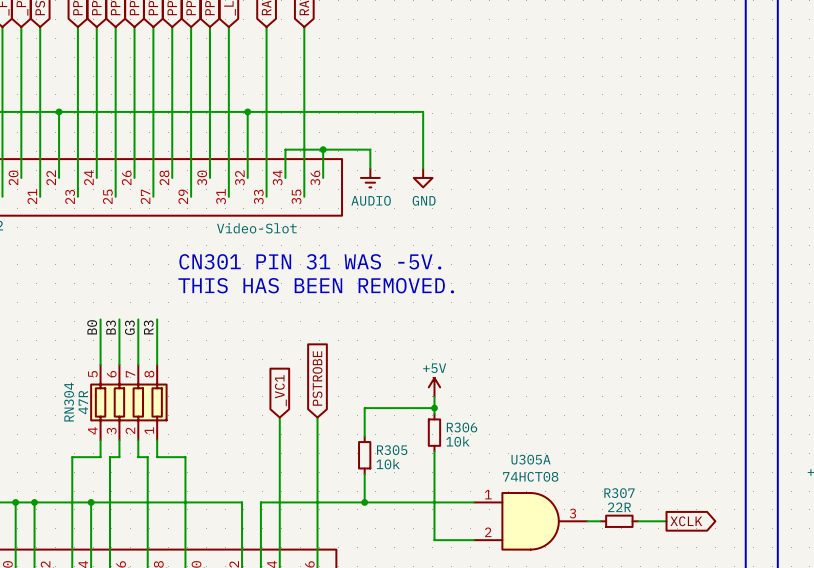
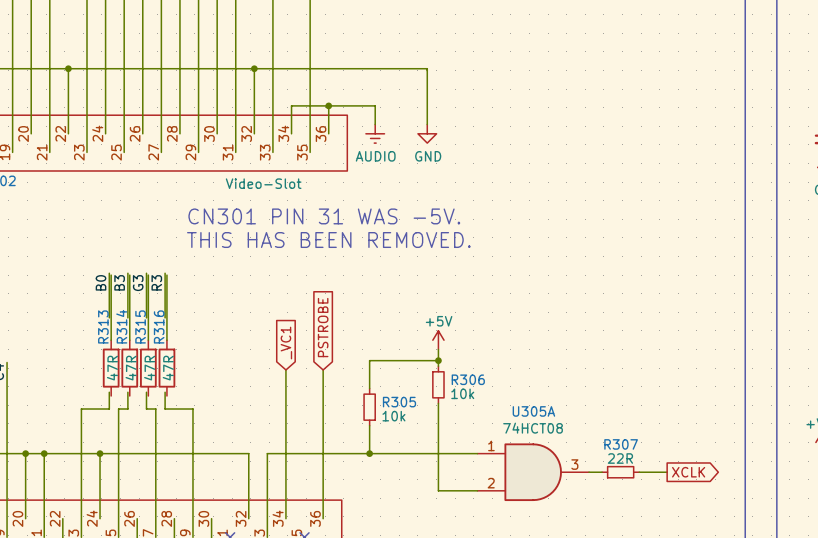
wire: none -> (111, 275) (111, 340)
wire: none -> (129, 275) (129, 340)
wire: none -> (148, 275) (148, 340)
wire: none -> (166, 275) (166, 340)
RN304: 47R (128, 402) -> none
R313: none -> 47R (111, 368)
R314: none -> 47R (129, 368)
R315: none -> 47R (148, 368)
R316: none -> 47R (166, 368)

